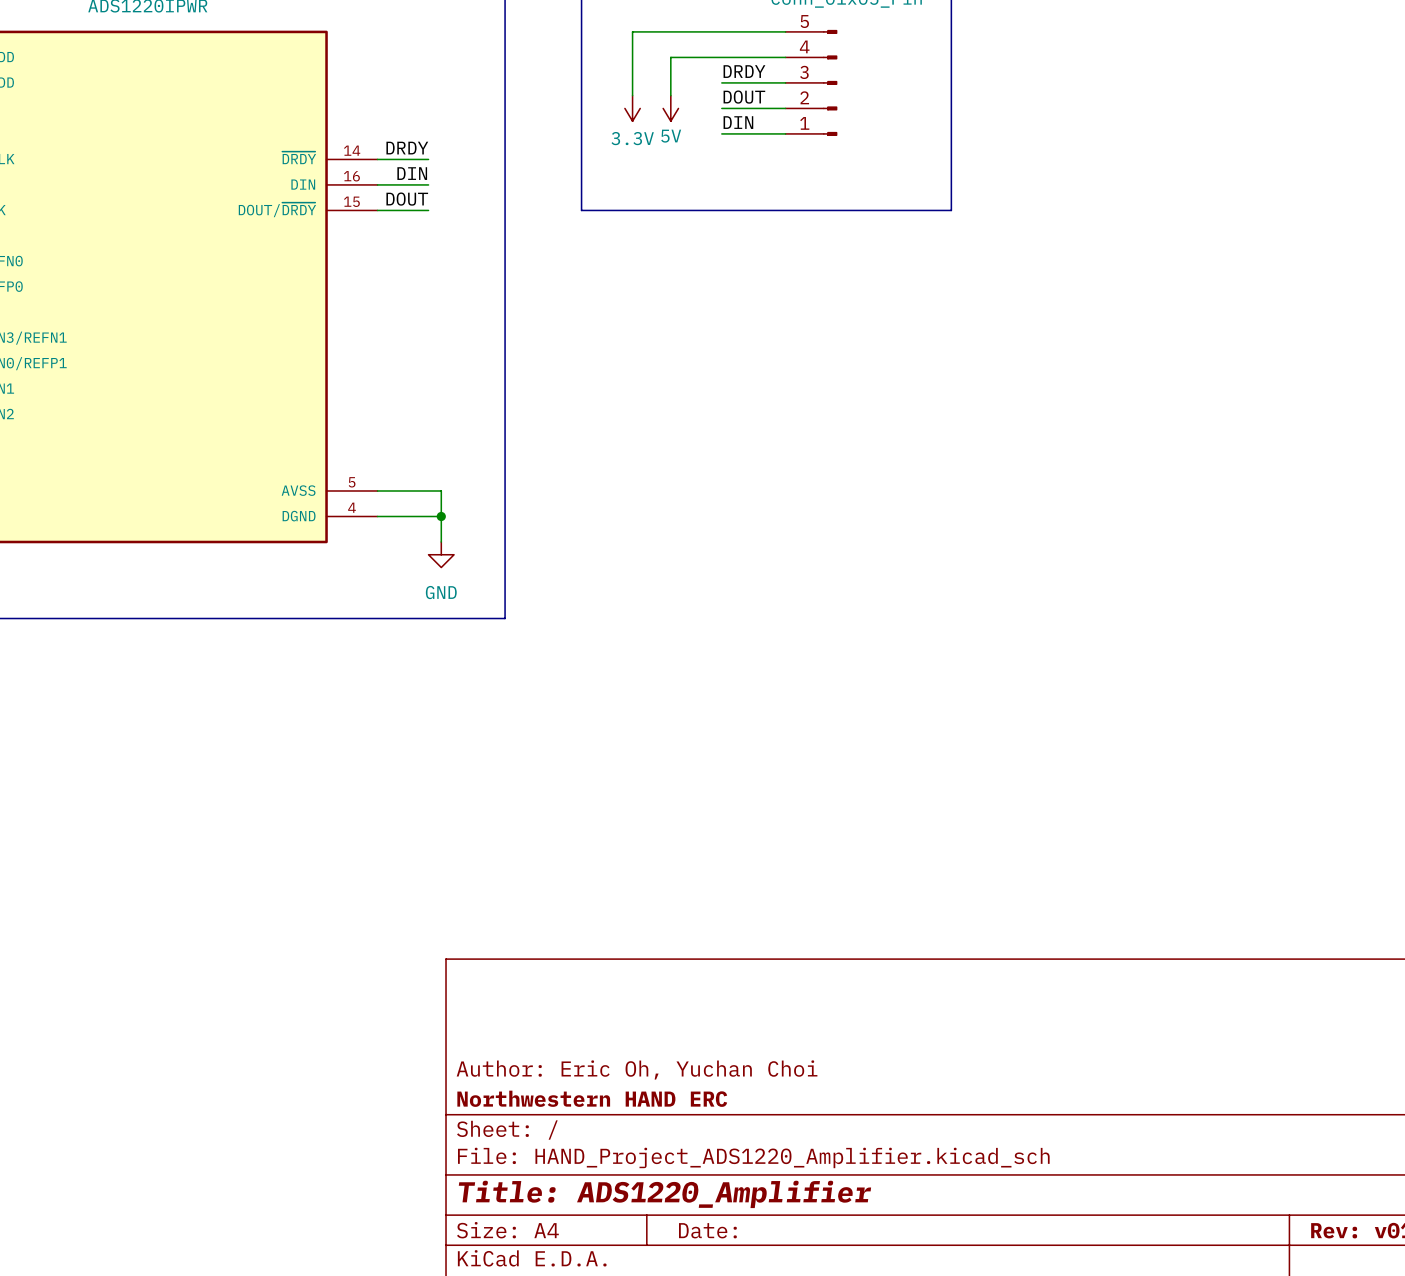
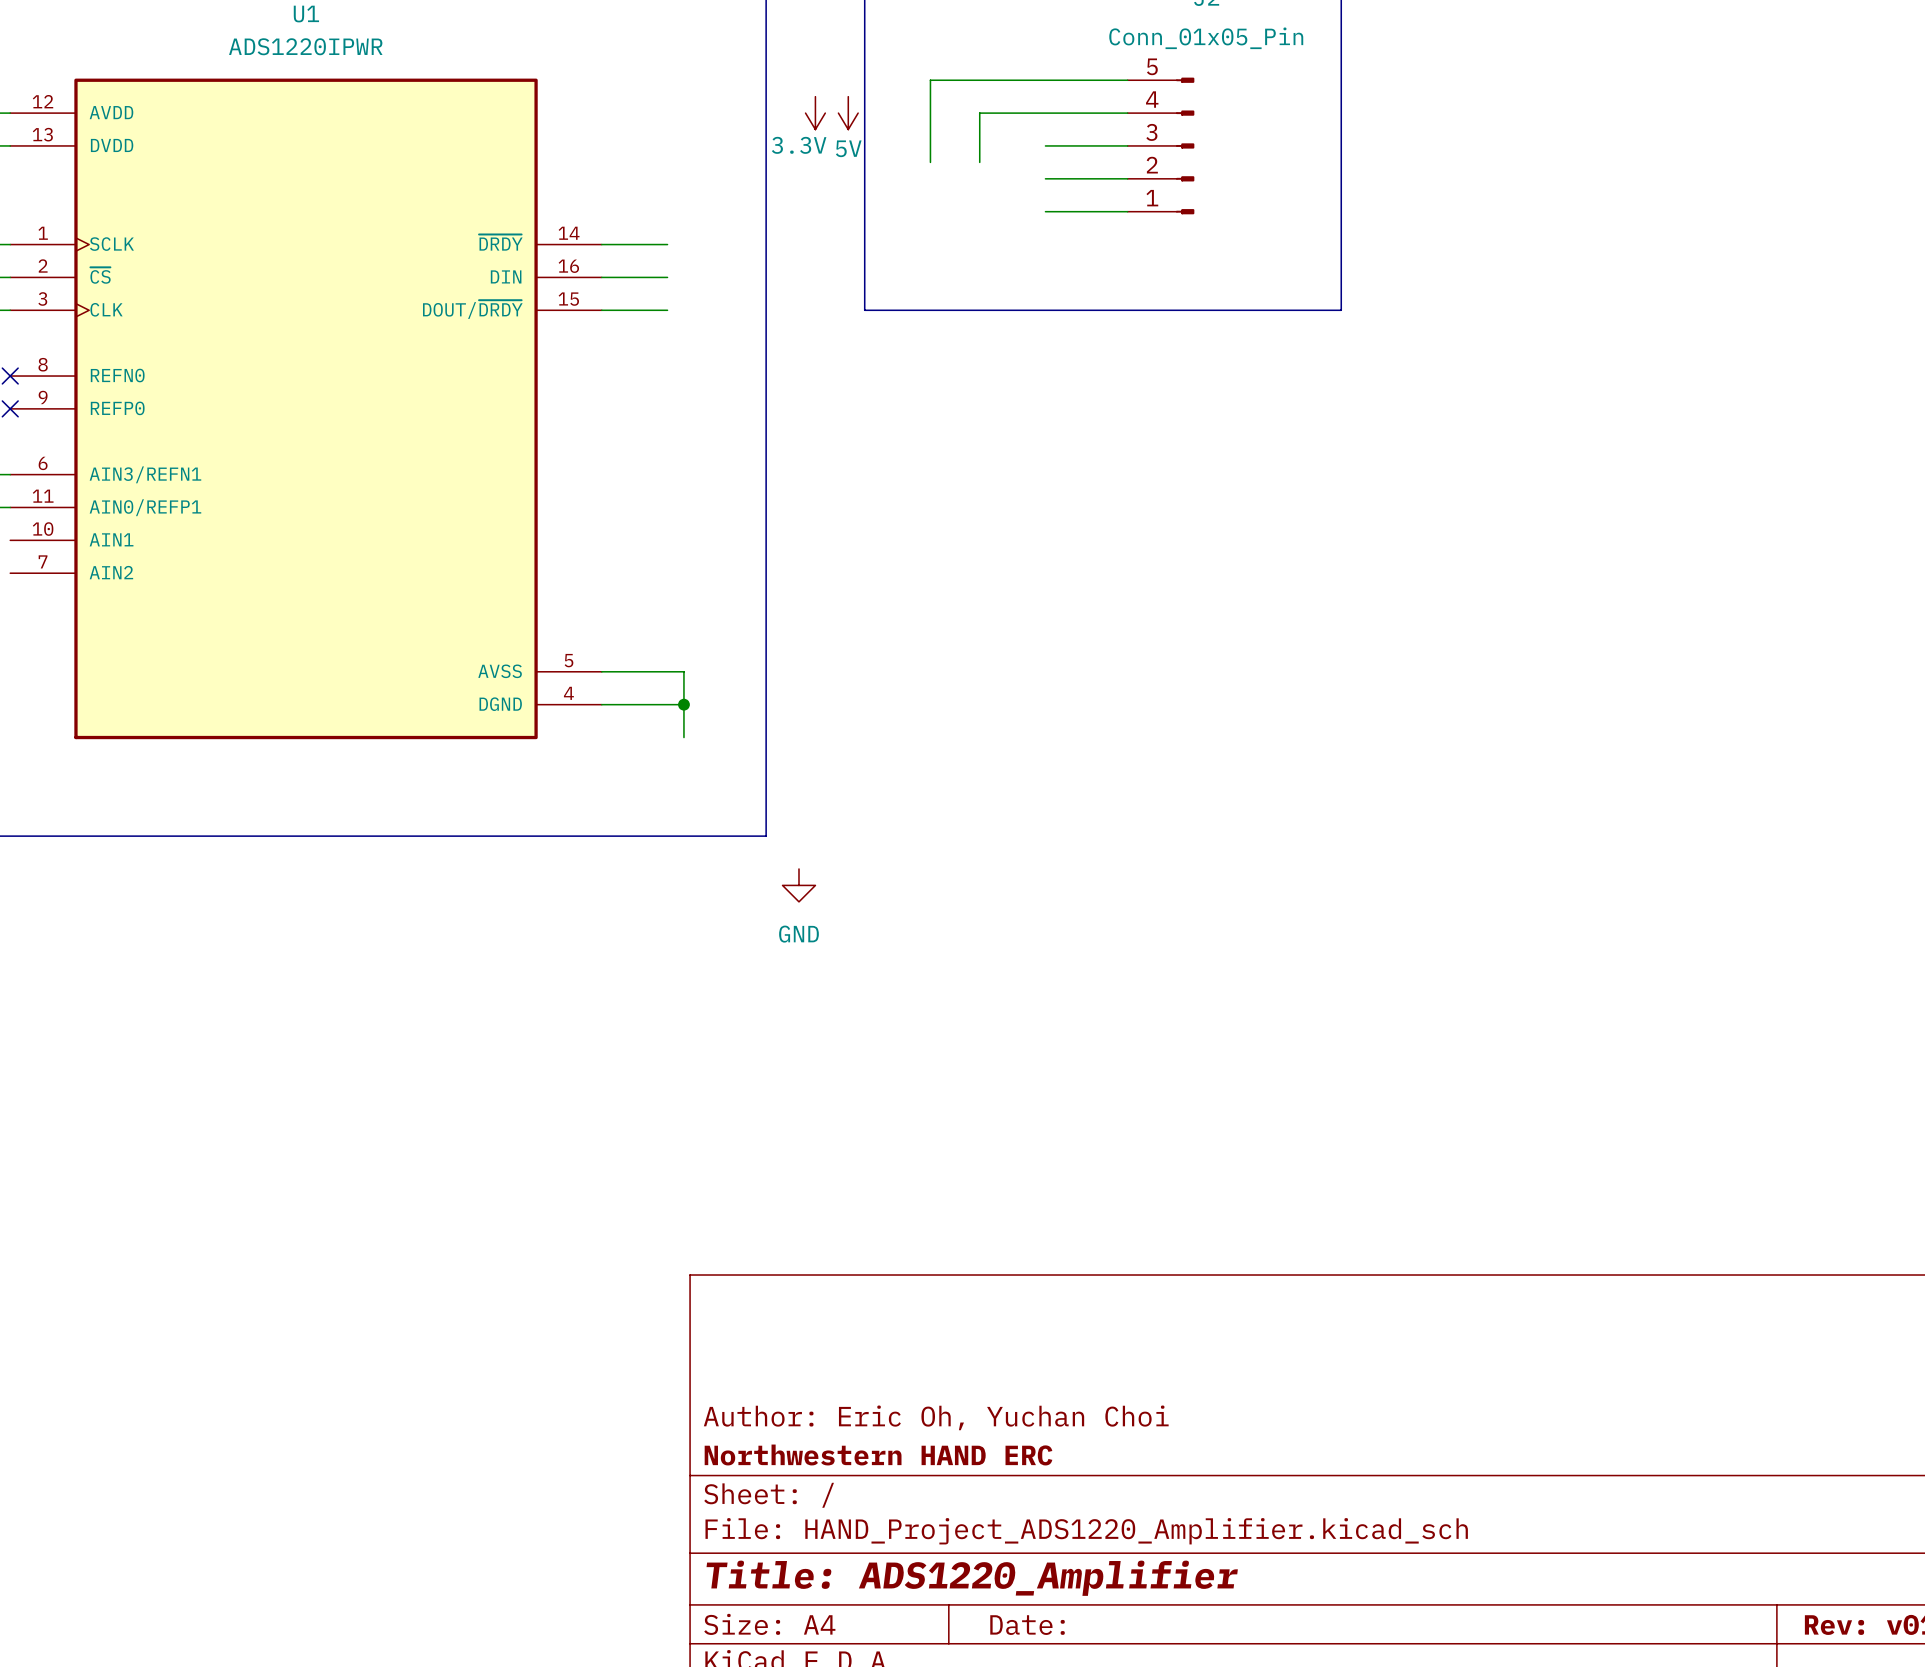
label: DRDY (744, 71) -> none
label: DOUT (744, 97) -> none
power symbol position: 3.3V (632, 108) -> 3.3V (815, 113)
power symbol position: 5V (670, 108) -> 5V (848, 113)
label: DIN (738, 122) -> none
power symbol text position: 3.3V (632, 138) -> 3.3V (799, 145)
label: DRDY (407, 148) -> none
label: DIN (412, 173) -> none
label: DOUT (407, 199) -> none
power symbol position: GND (441, 554) -> GND (798, 885)

